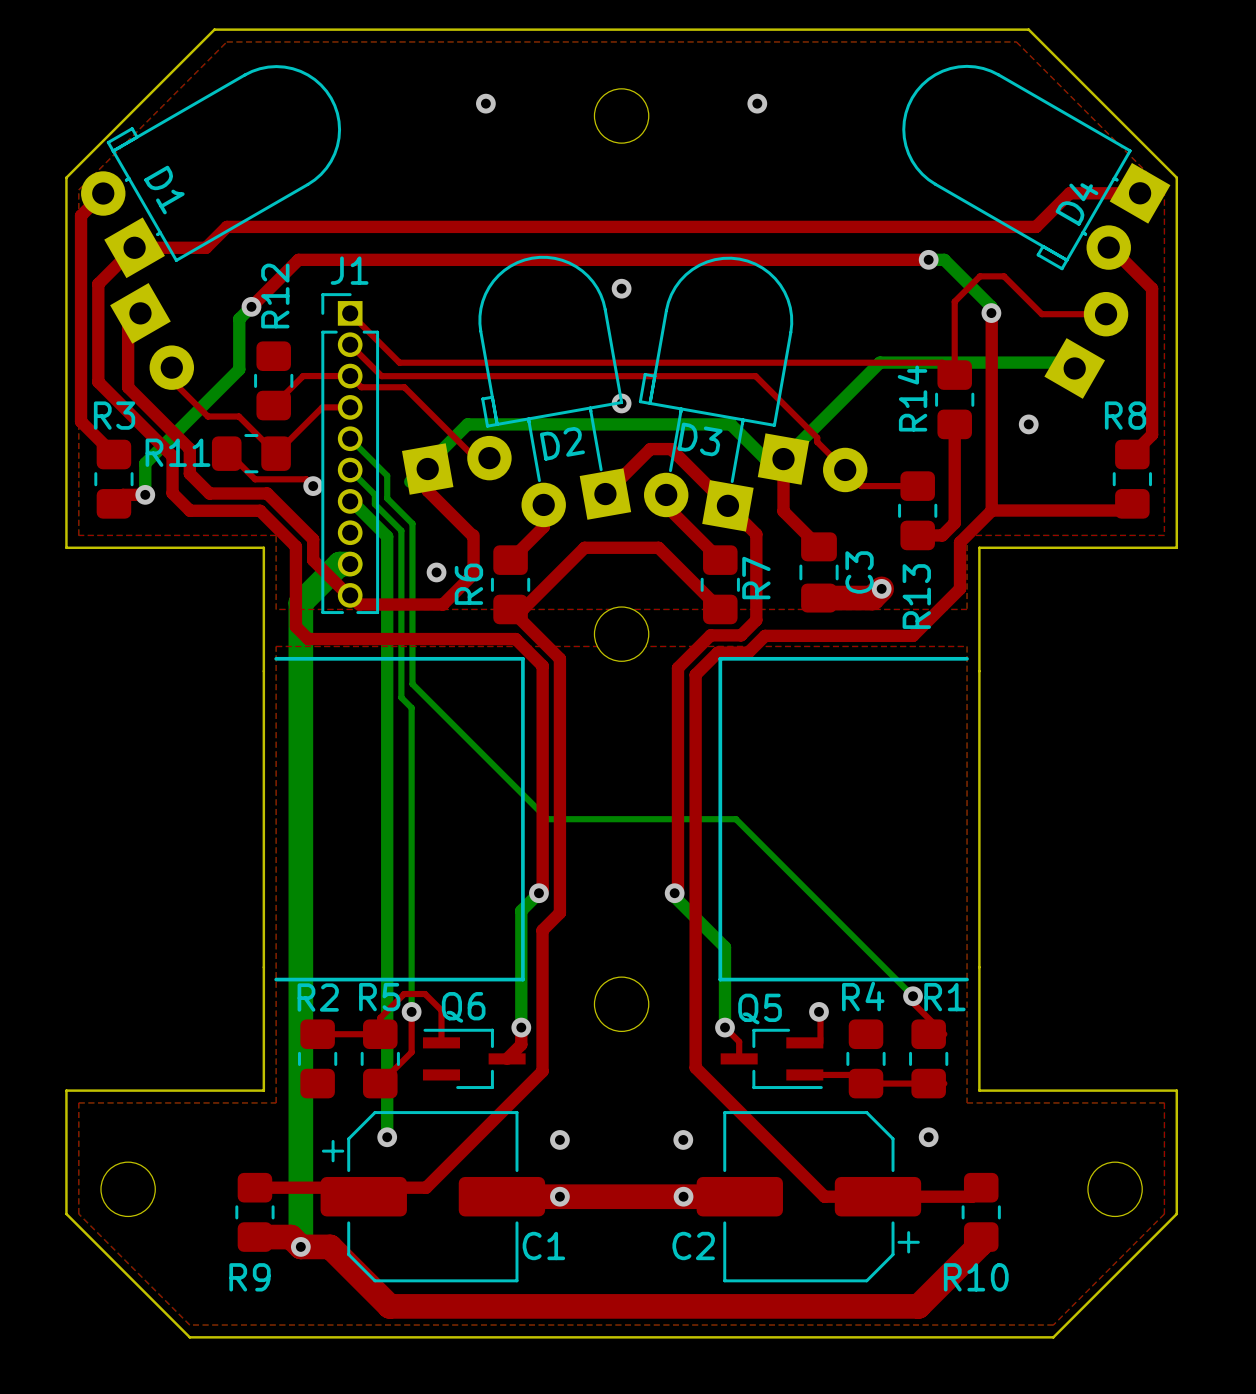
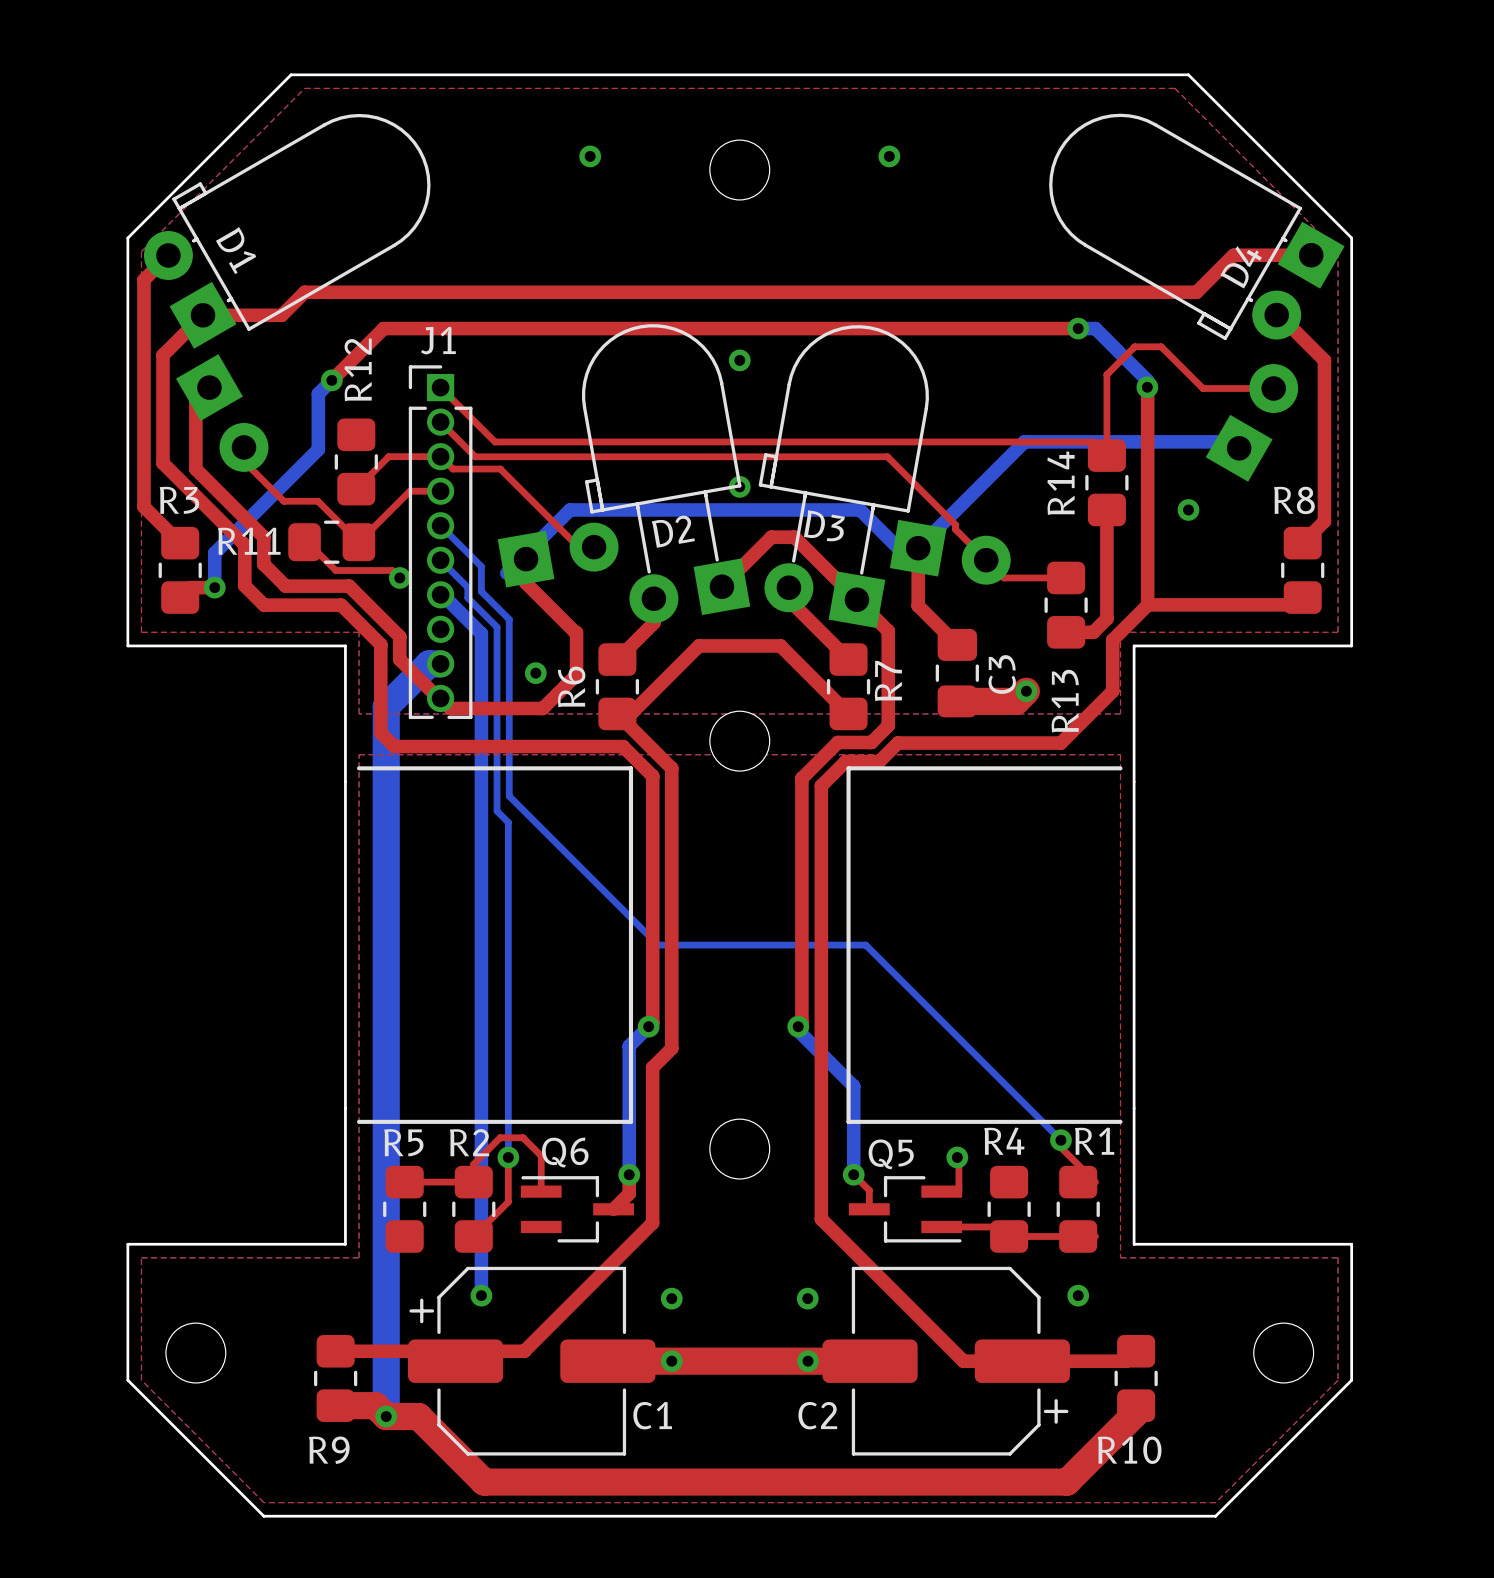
R2 name position: R2 (318, 997) -> R2 (469, 1142)
R5 name position: R5 (379, 997) -> R5 (403, 1142)

